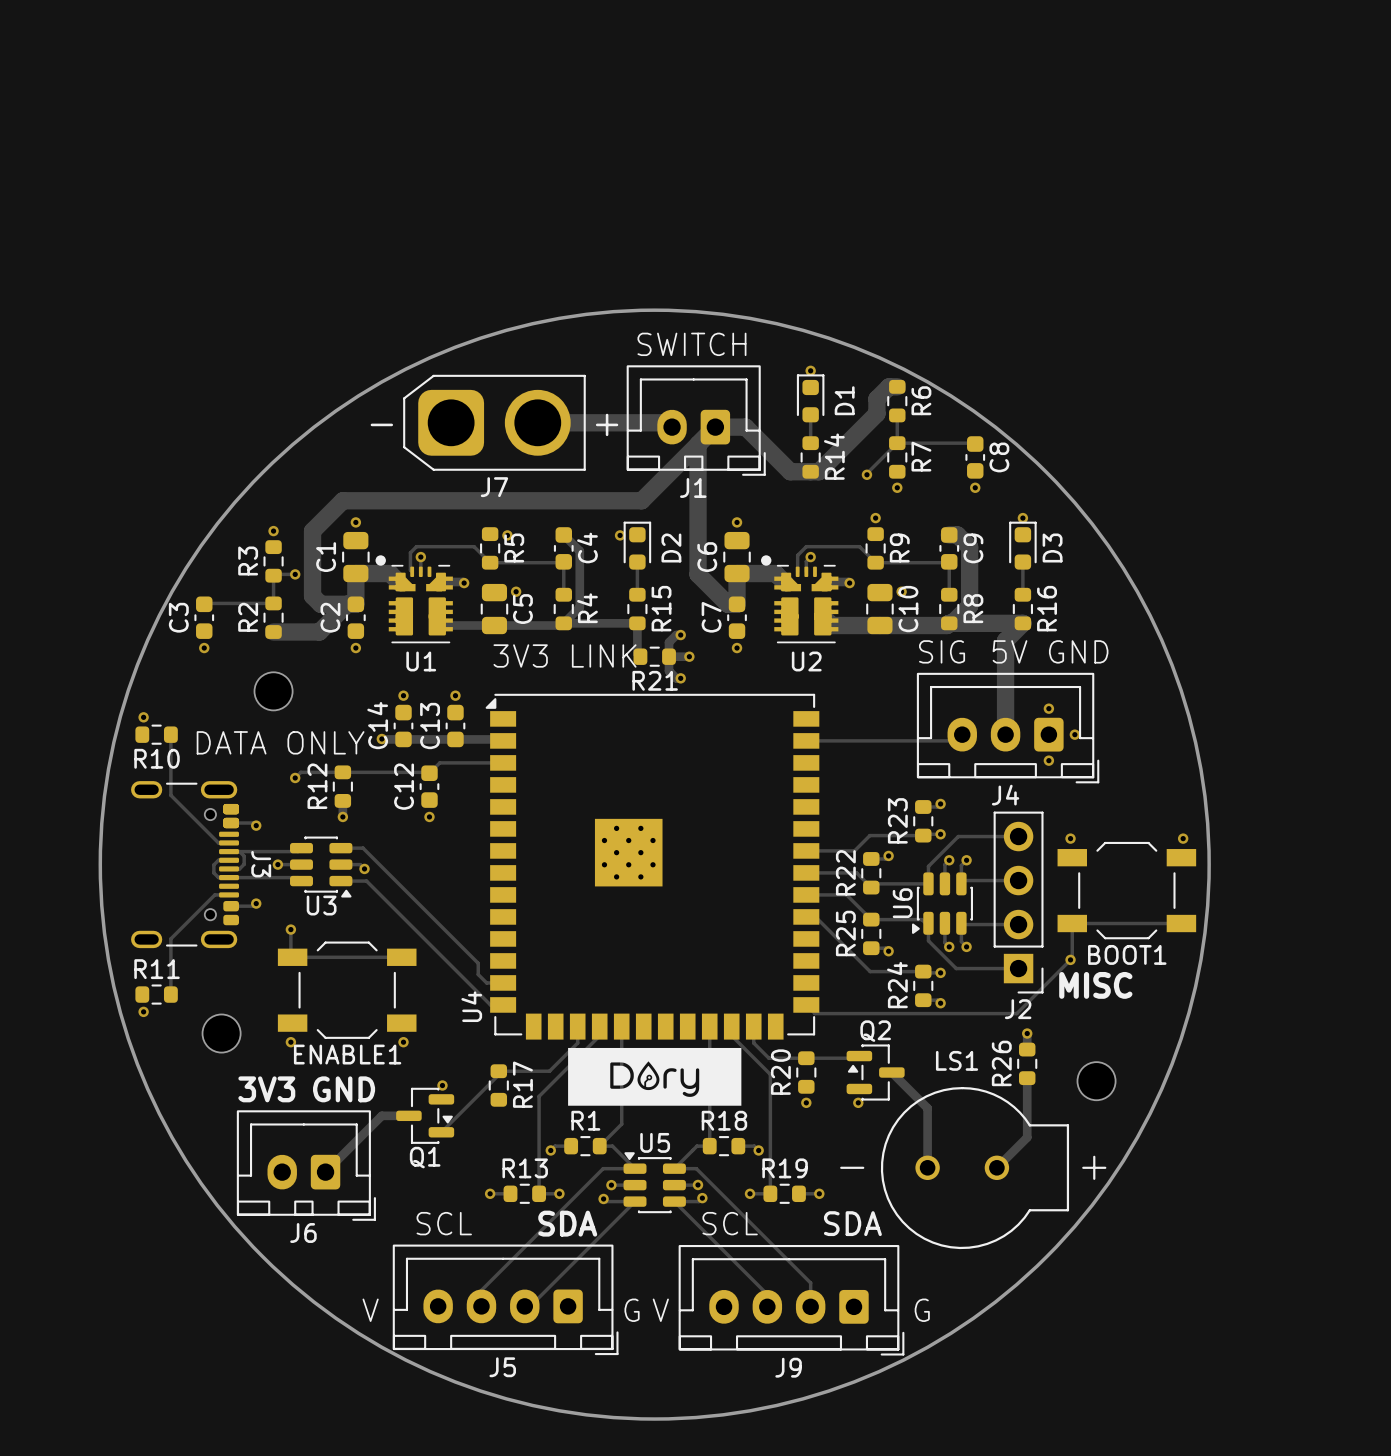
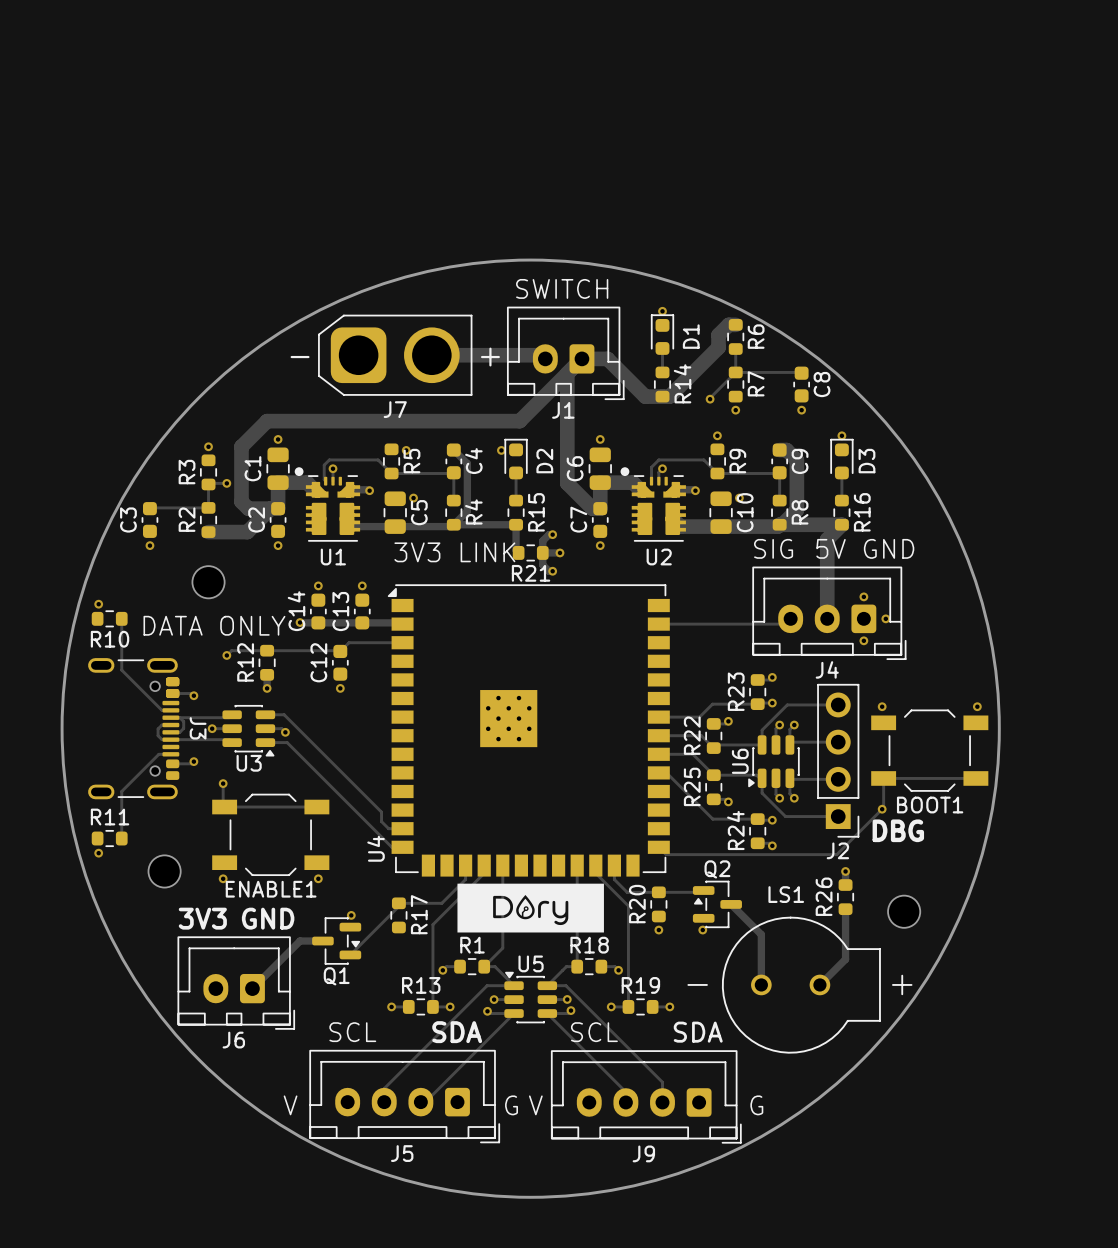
text: MISC (1095, 985) -> DBG (898, 830)

